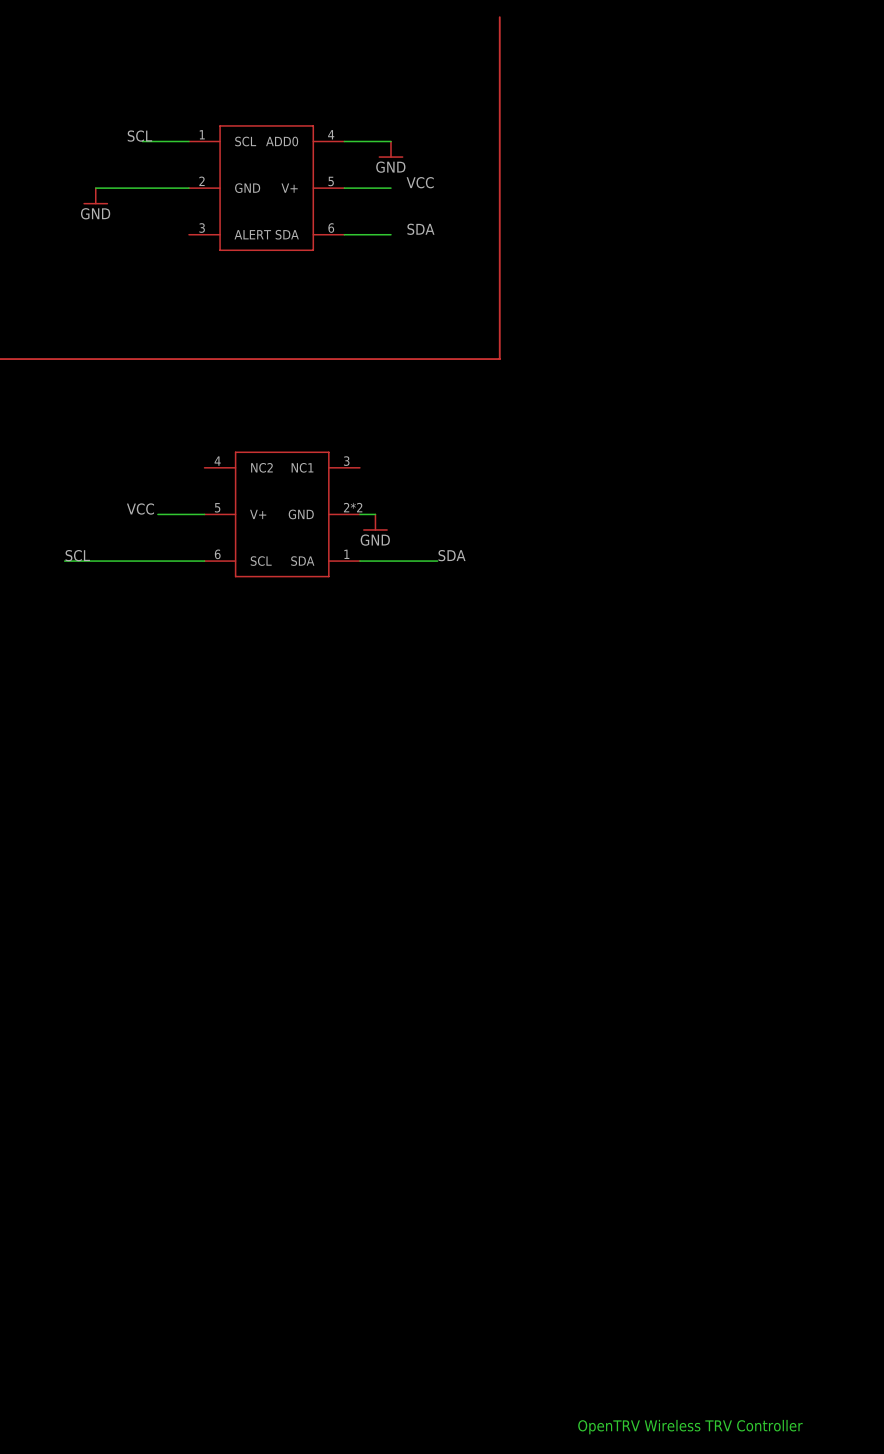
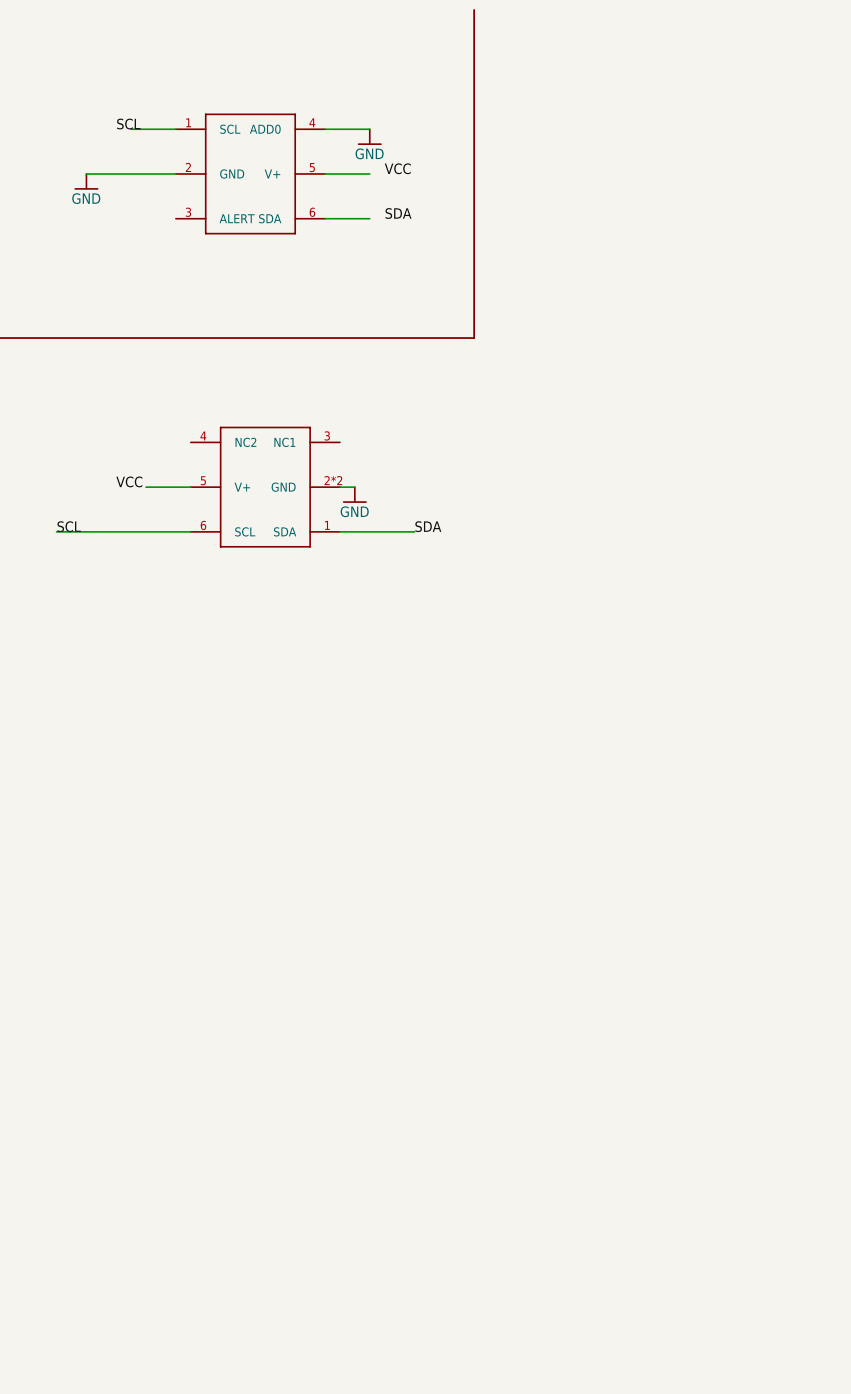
text: OpenTRV Wireless TRV Controller (690, 1427) -> none

